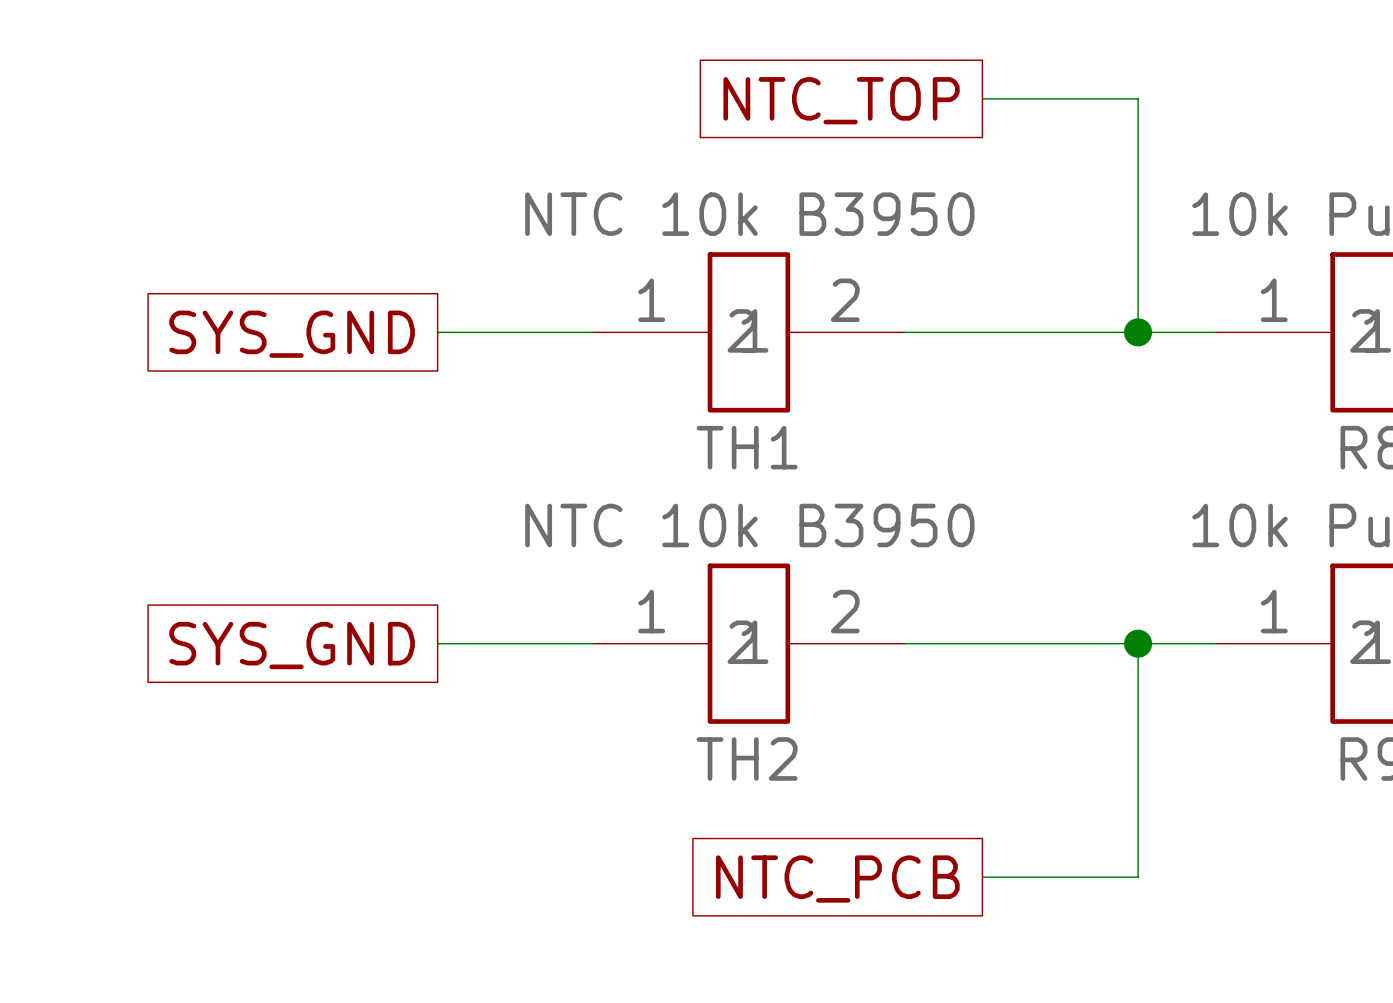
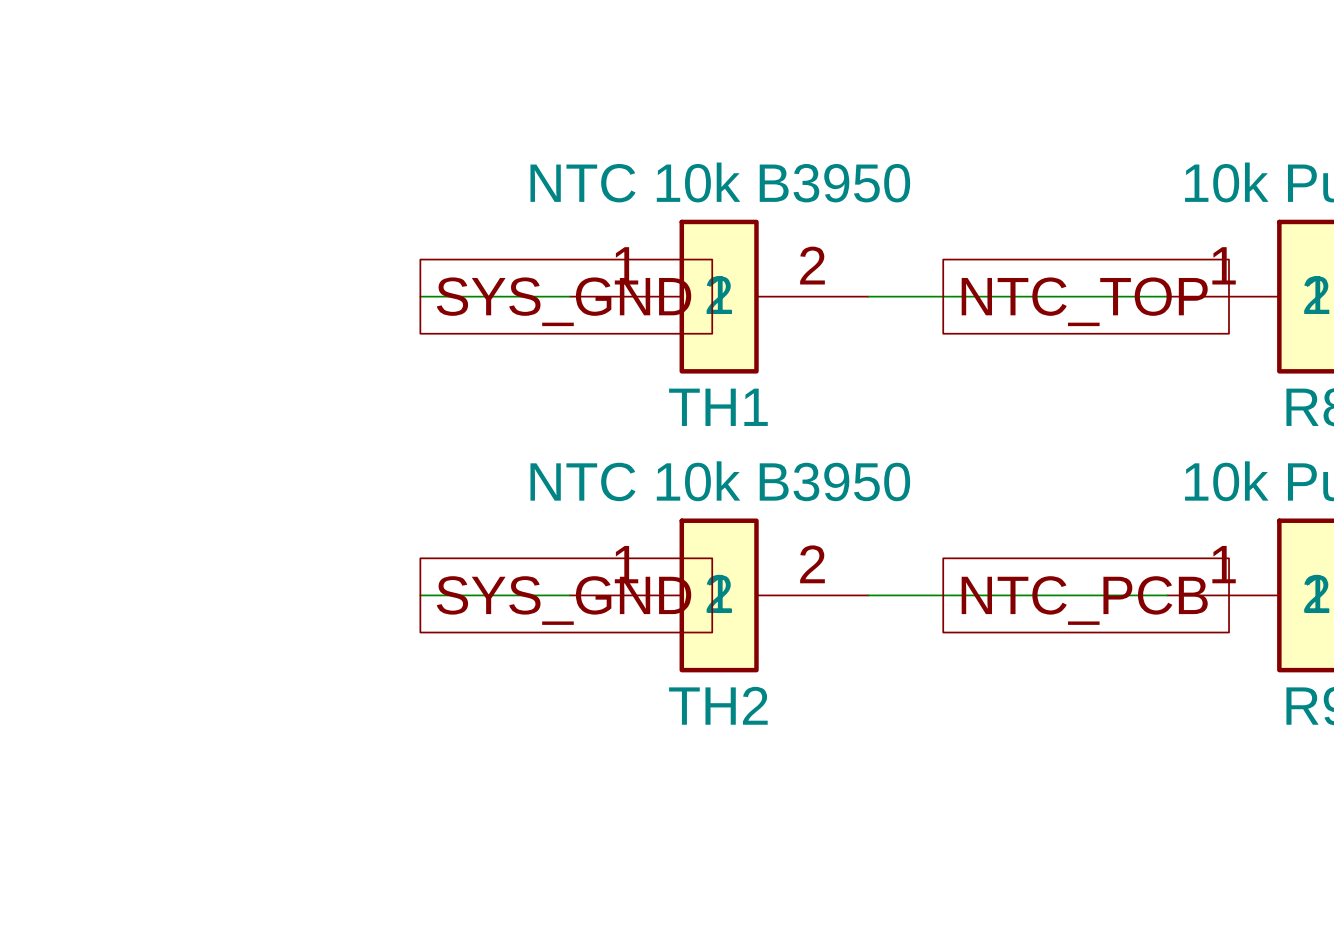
wire: (982, 98) (1138, 98) (1138, 332) -> none
global label rotation: 0° (841, 100) -> 180° (1084, 301)
global label position: NTC_TOP (841, 100) -> NTC_TOP (1084, 301)
junction: (1138, 332) -> none
global label rotation: 0° (292, 334) -> 180° (564, 301)
global label position: SYS_GND (292, 334) -> SYS_GND (564, 301)
wire: (1138, 643) (1138, 877) (982, 877) -> none
junction: (1138, 643) -> none
global label rotation: 0° (292, 645) -> 180° (564, 600)
global label position: SYS_GND (292, 645) -> SYS_GND (564, 600)
global label rotation: 0° (837, 879) -> 180° (1084, 600)
global label position: NTC_PCB (837, 879) -> NTC_PCB (1084, 600)

